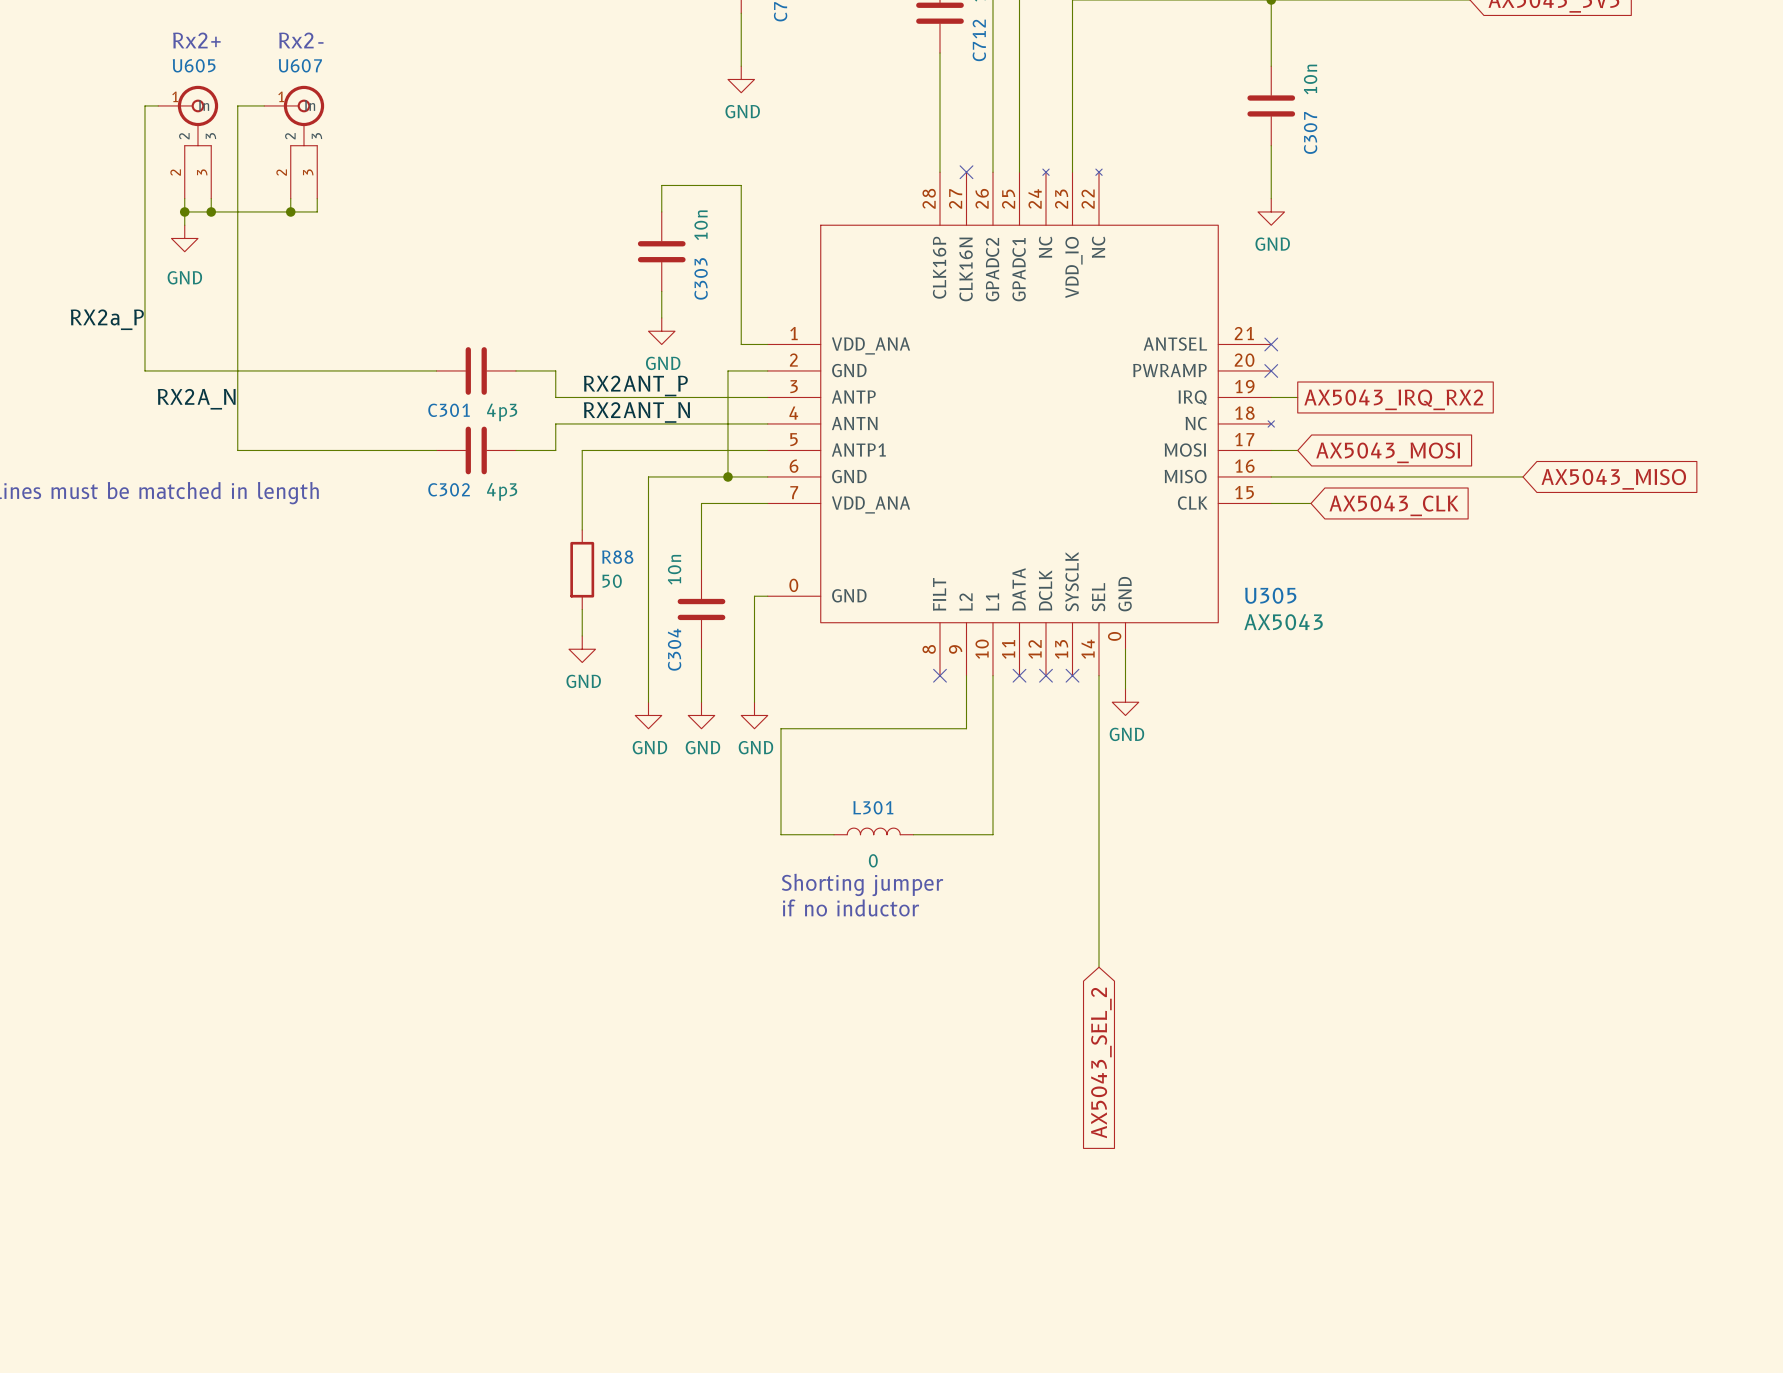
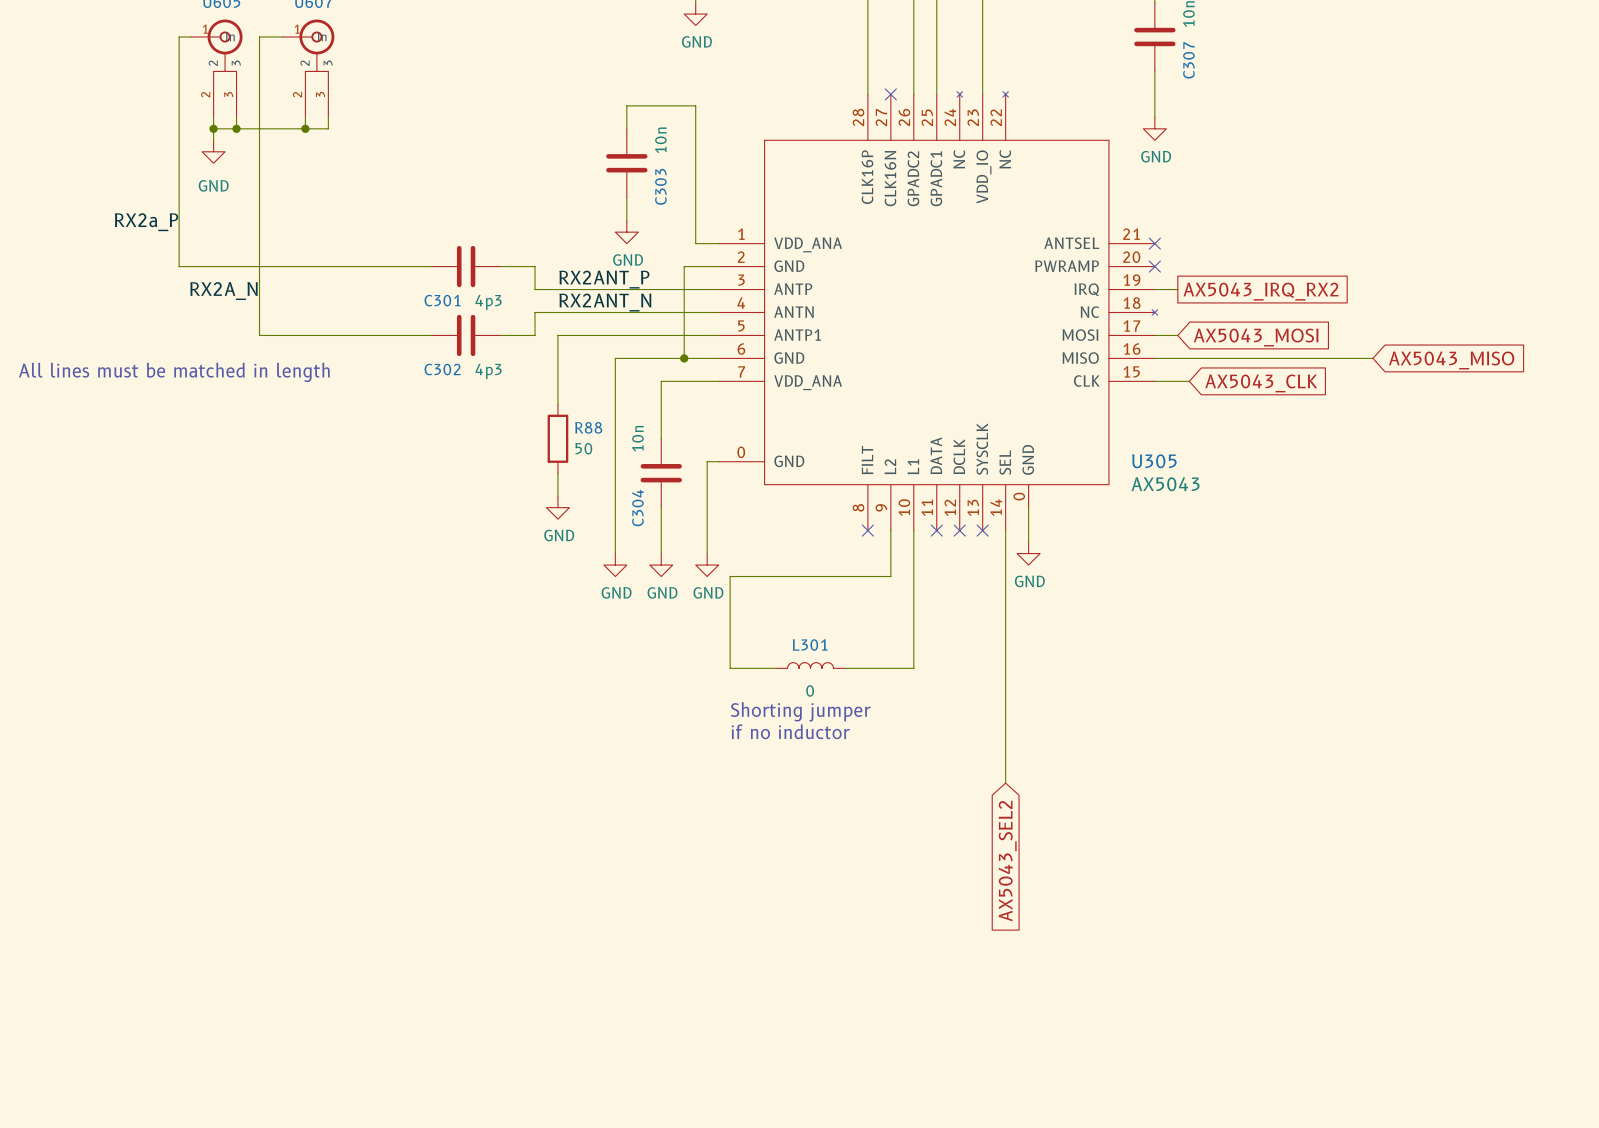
global label: AX5043_SEL_2 (1101, 1062) -> AX5043_SEL2 (1007, 861)

